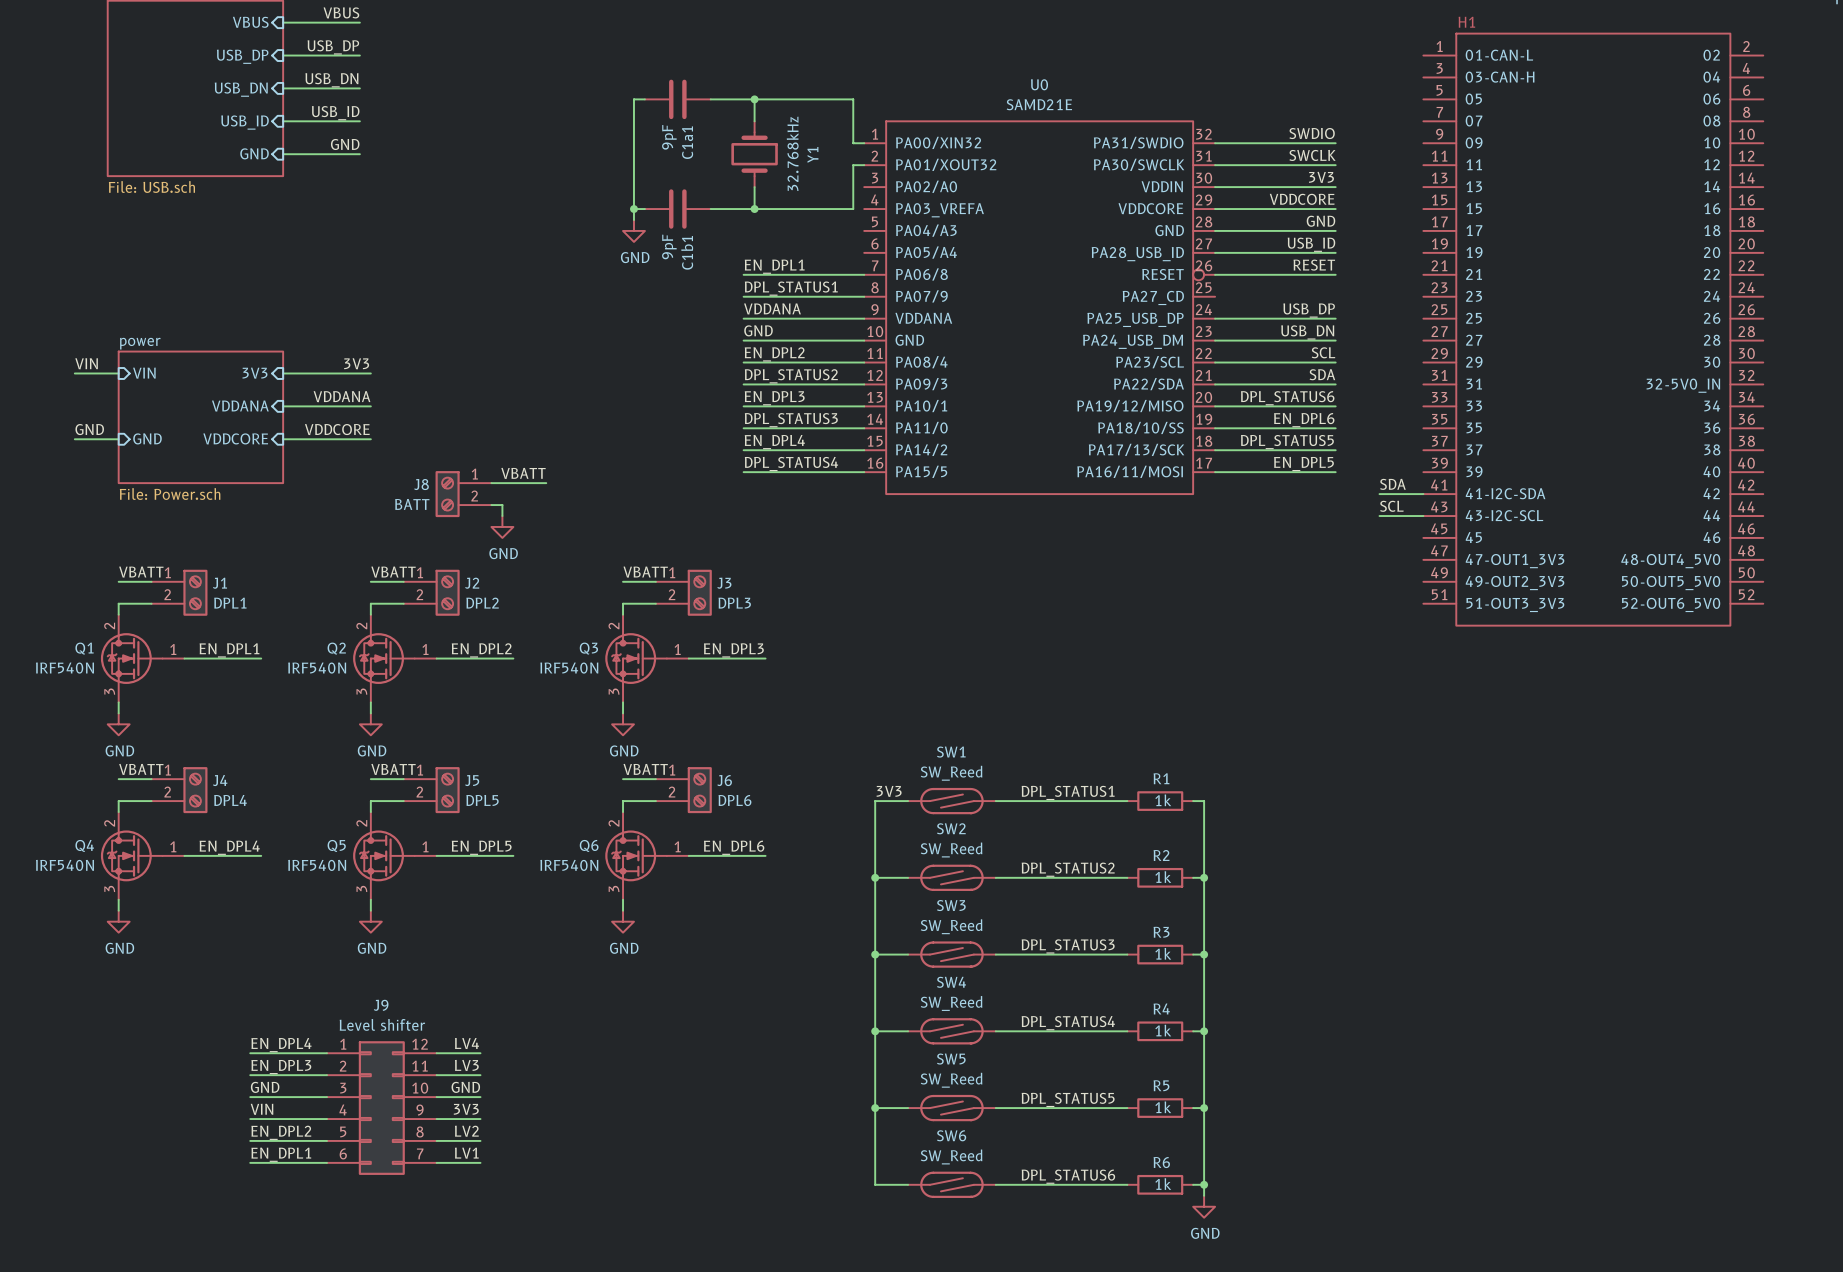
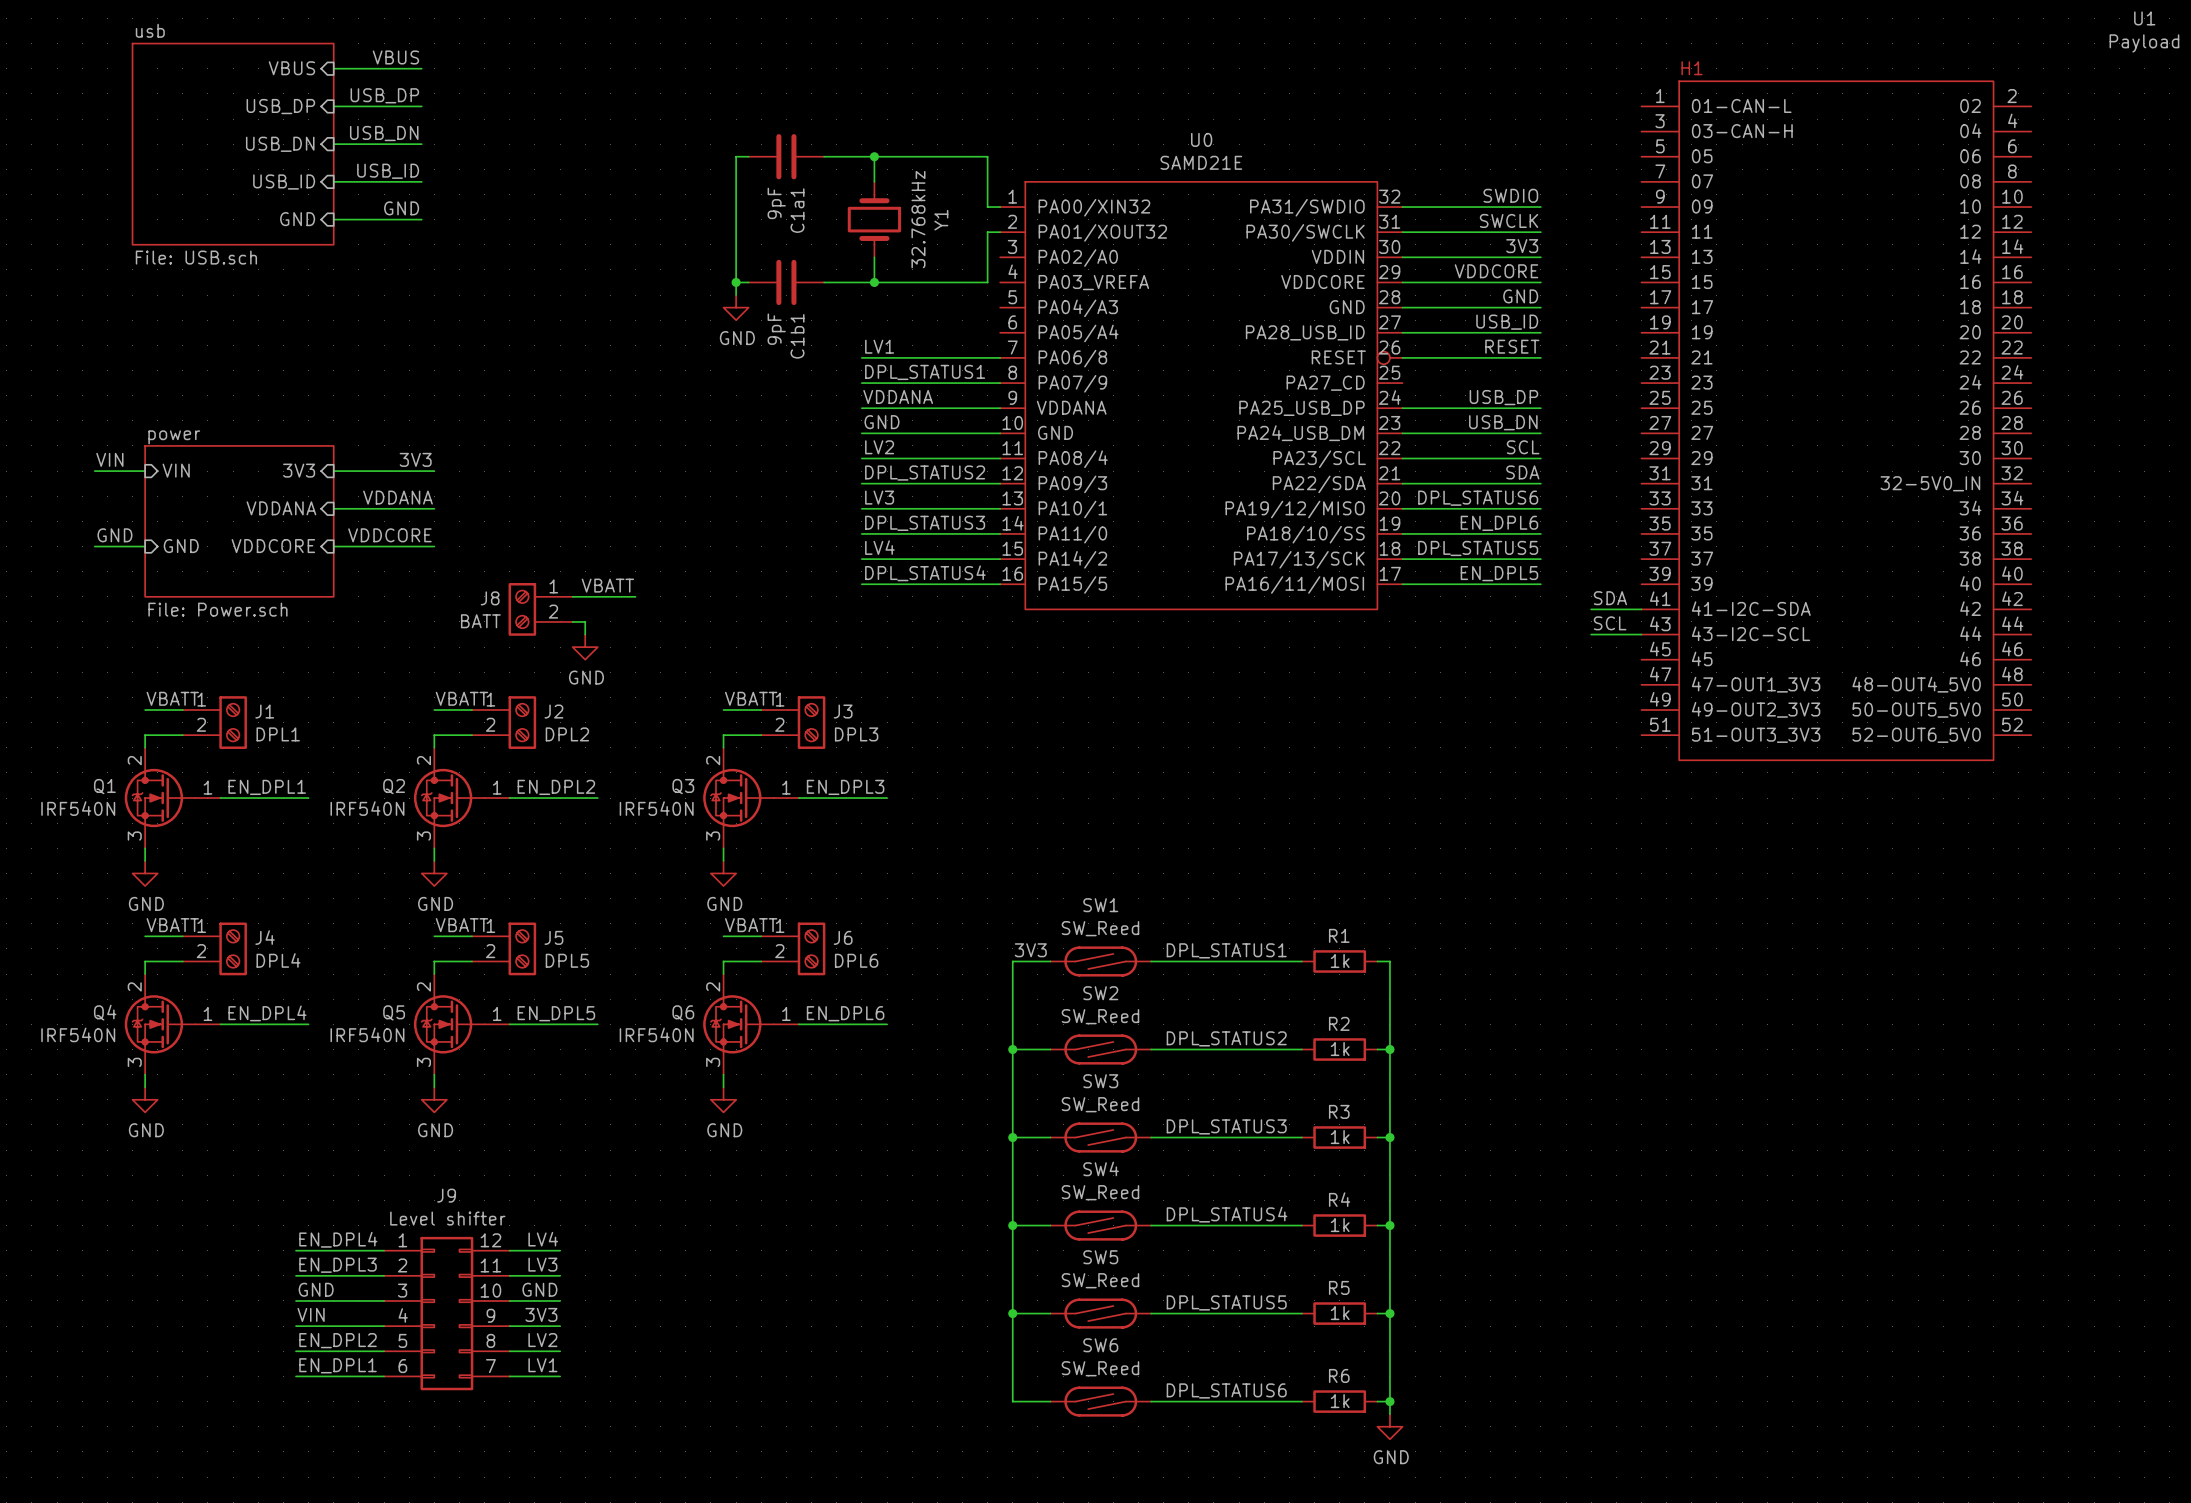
label: EN_DPL1 (774, 266) -> LV1 (879, 346)
label: EN_DPL2 (774, 354) -> LV2 (879, 447)
label: EN_DPL3 (774, 398) -> LV3 (879, 497)
label: EN_DPL4 (774, 442) -> LV4 (879, 547)

